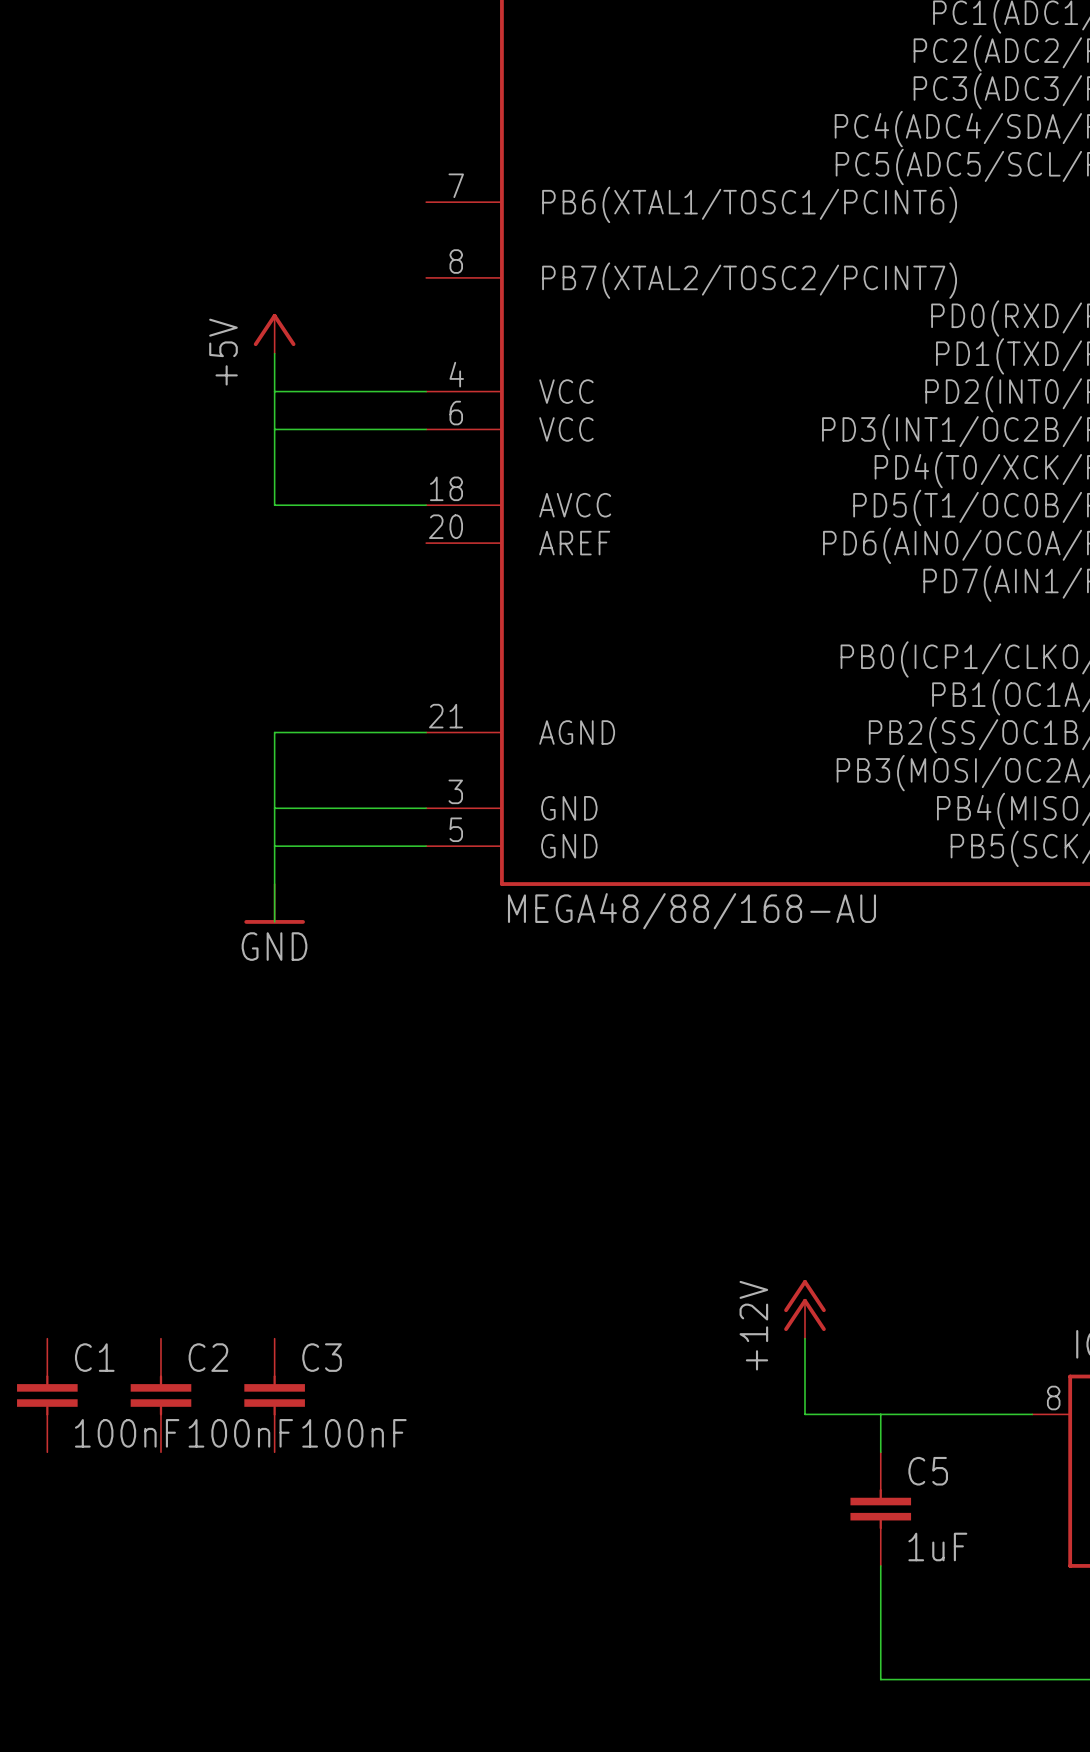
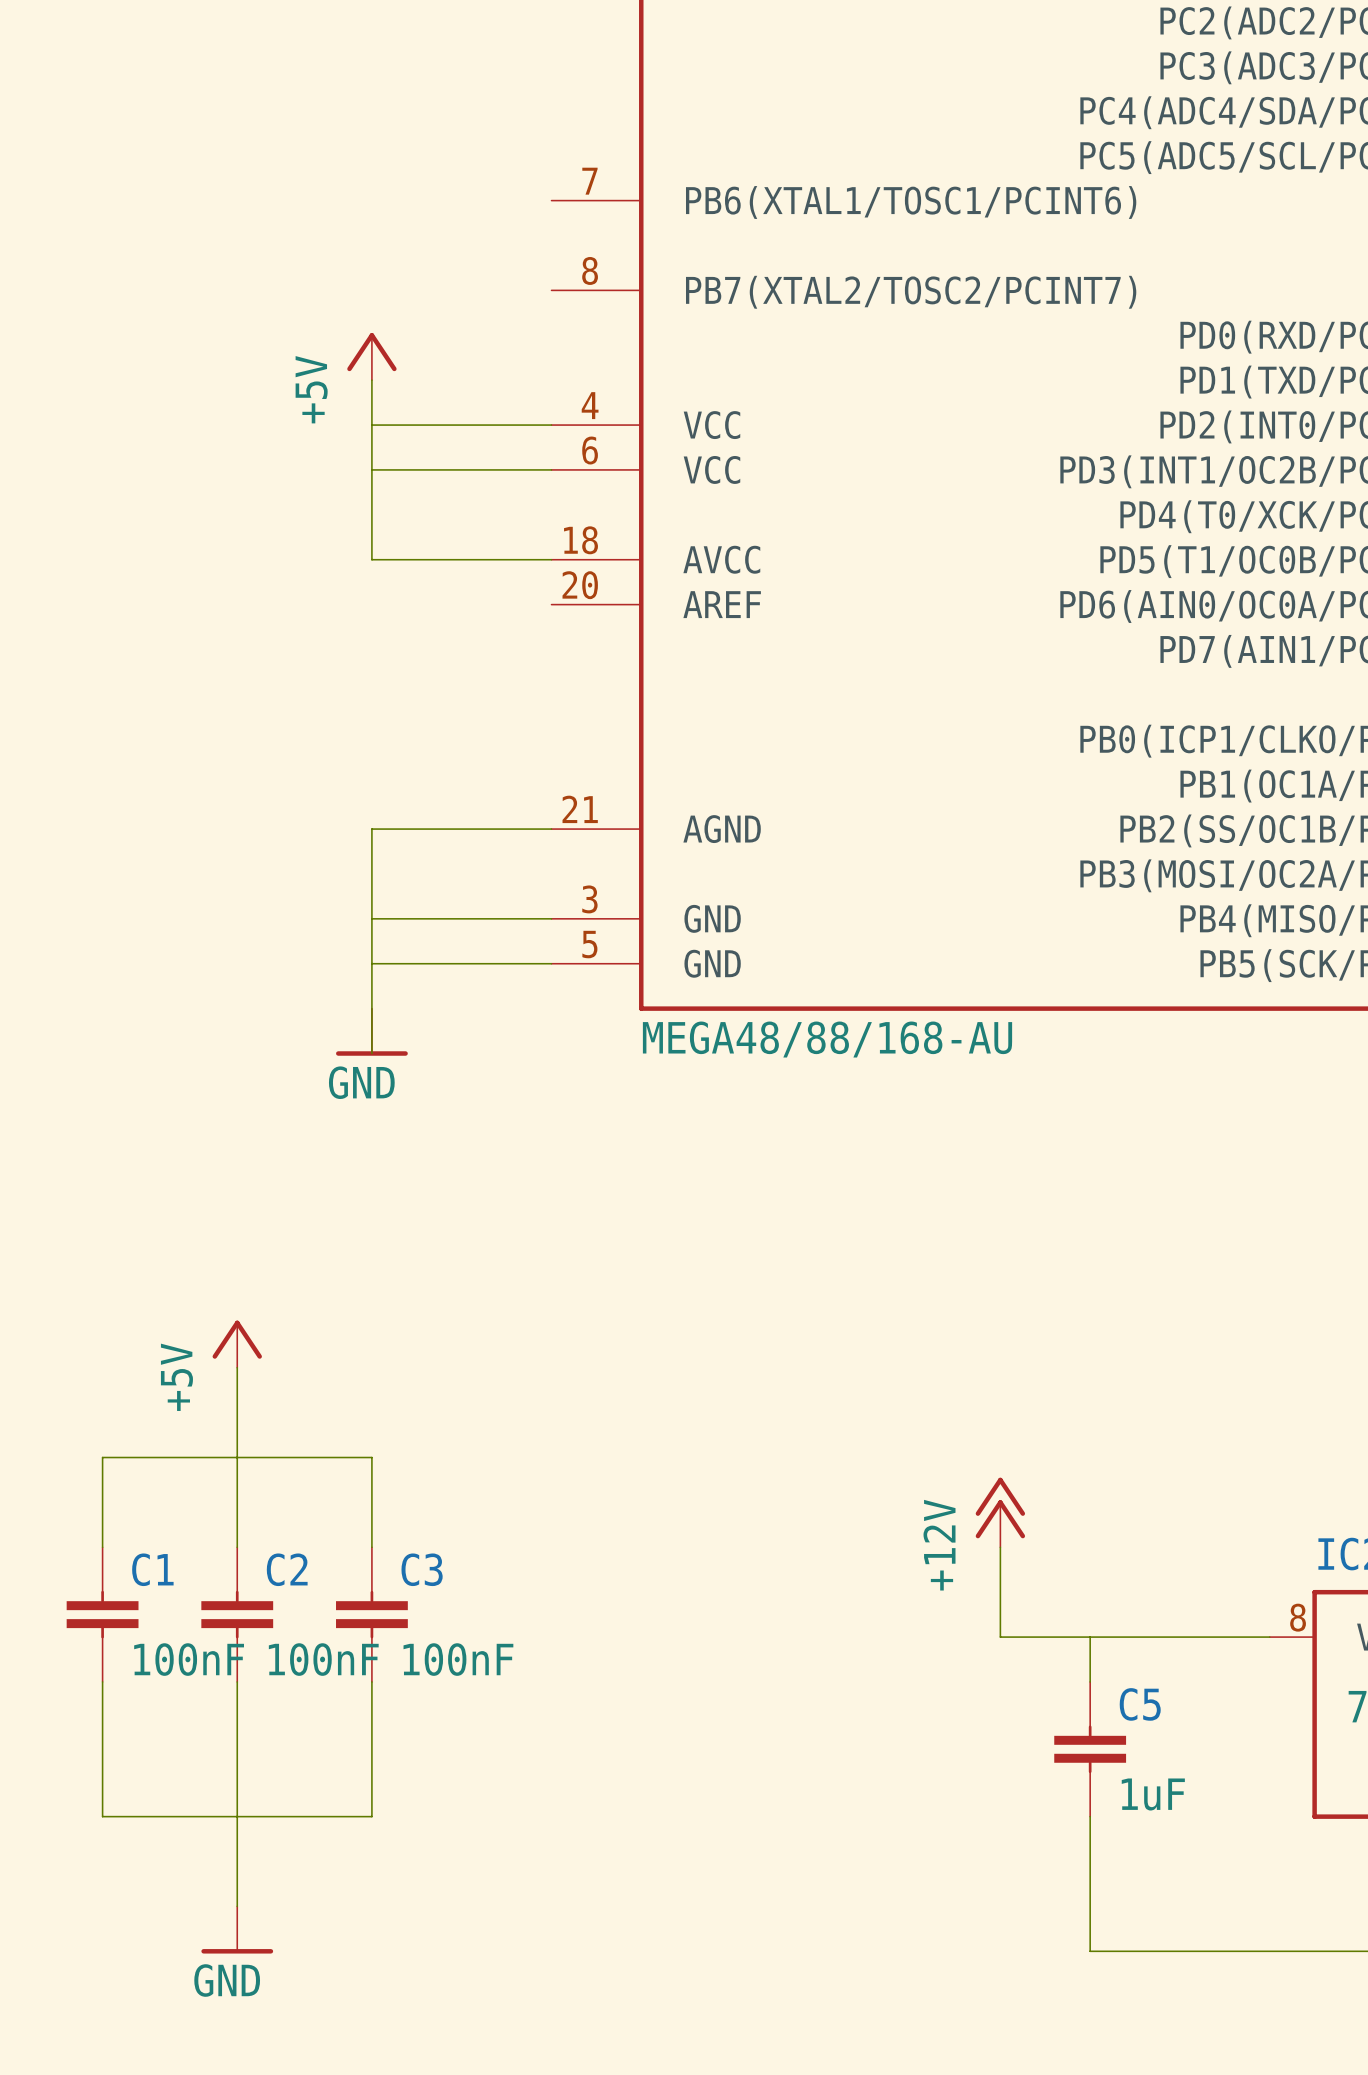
power symbol: none -> +5V (237, 1344)
wire: none -> (237, 1367) (237, 1547)
wire: none -> (102, 1547) (102, 1457) (371, 1457) (371, 1547)
wire: none -> (102, 1681) (102, 1816) (371, 1816) (371, 1681)
wire: none -> (237, 1681) (237, 1906)
power symbol: none -> GND (237, 1929)

